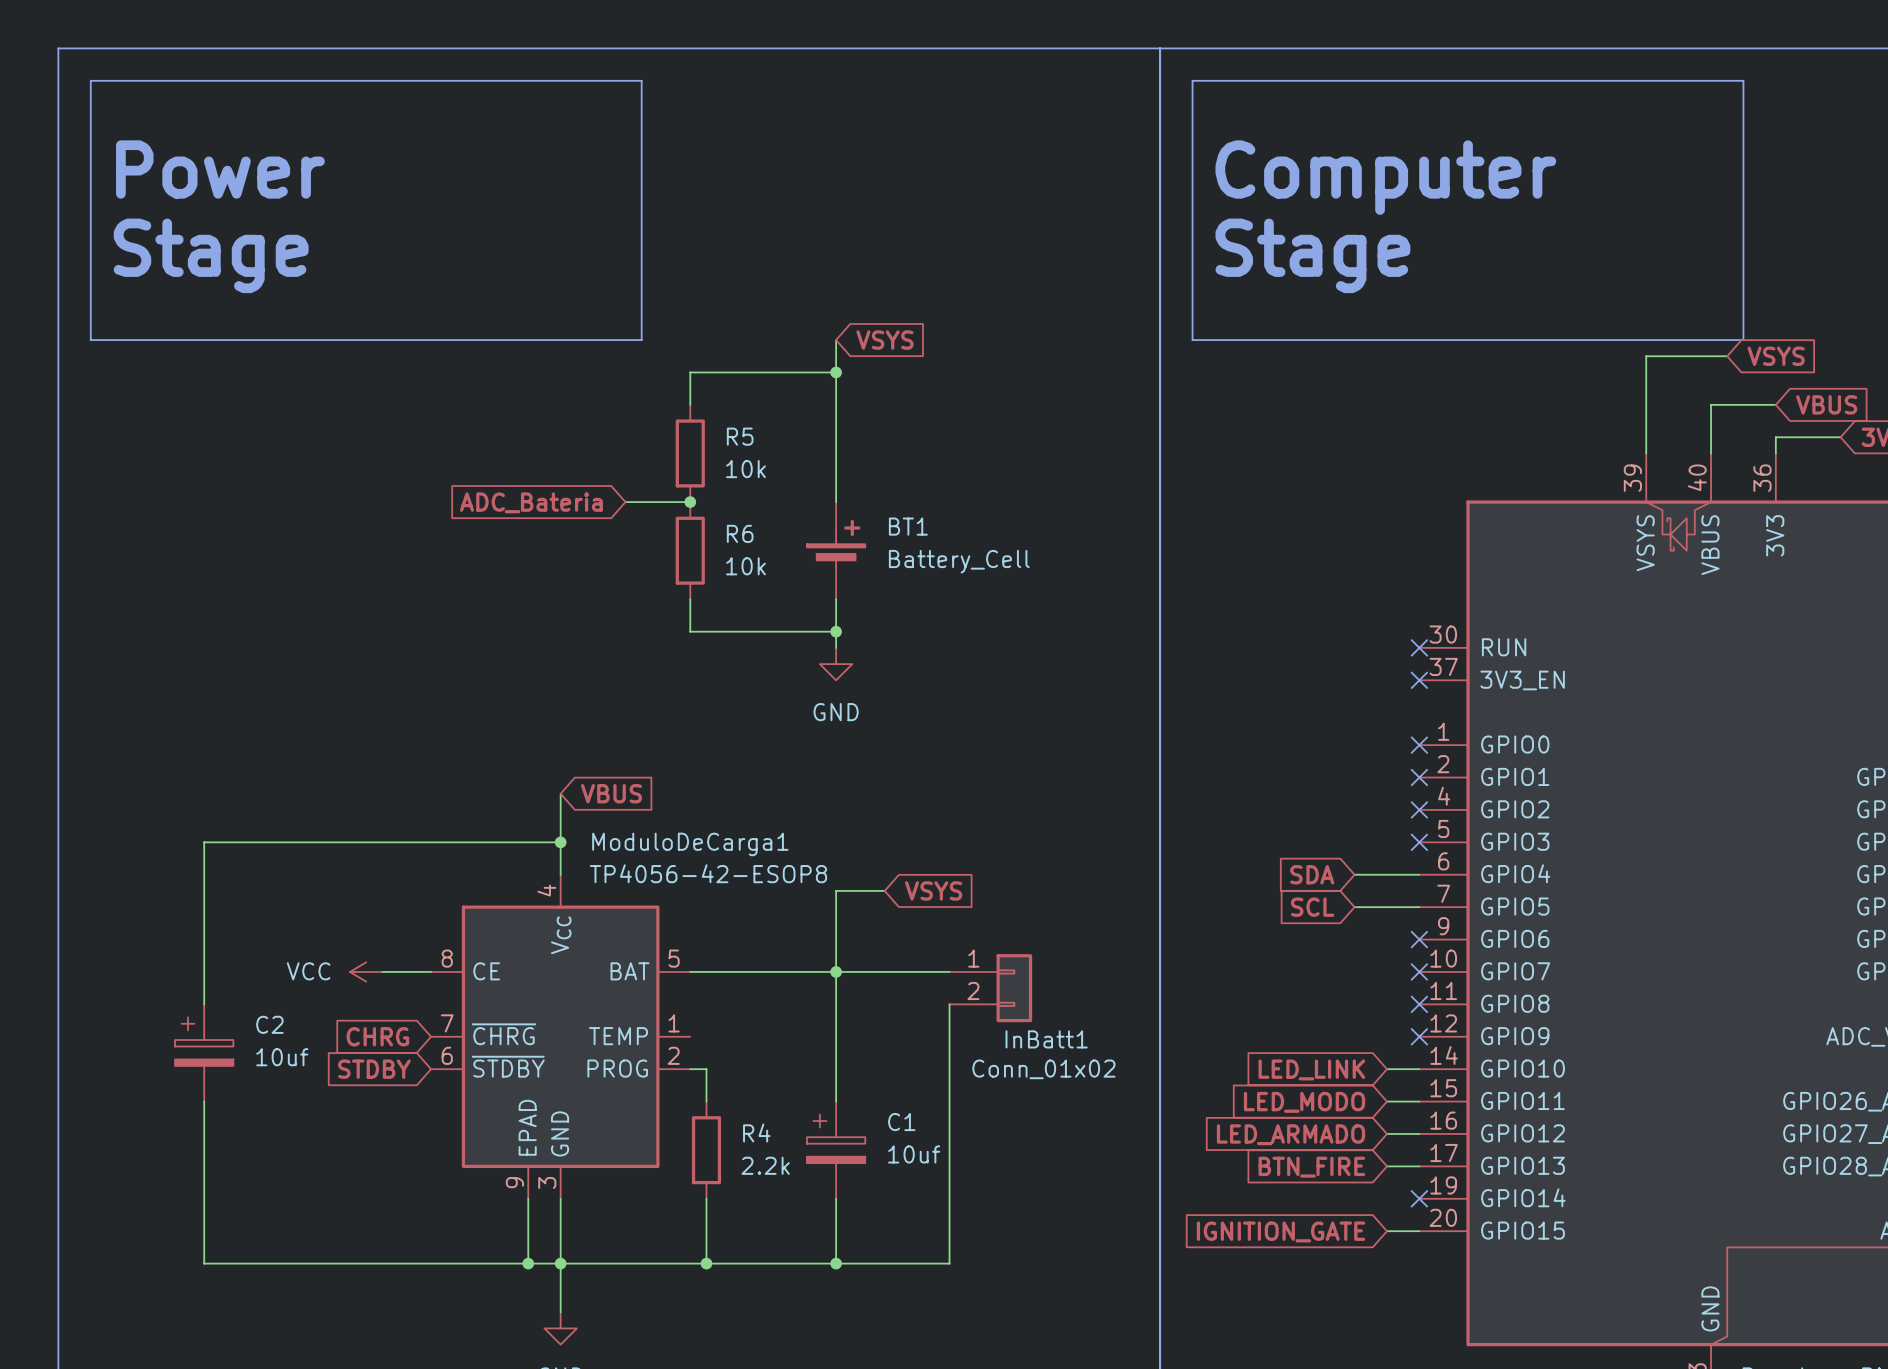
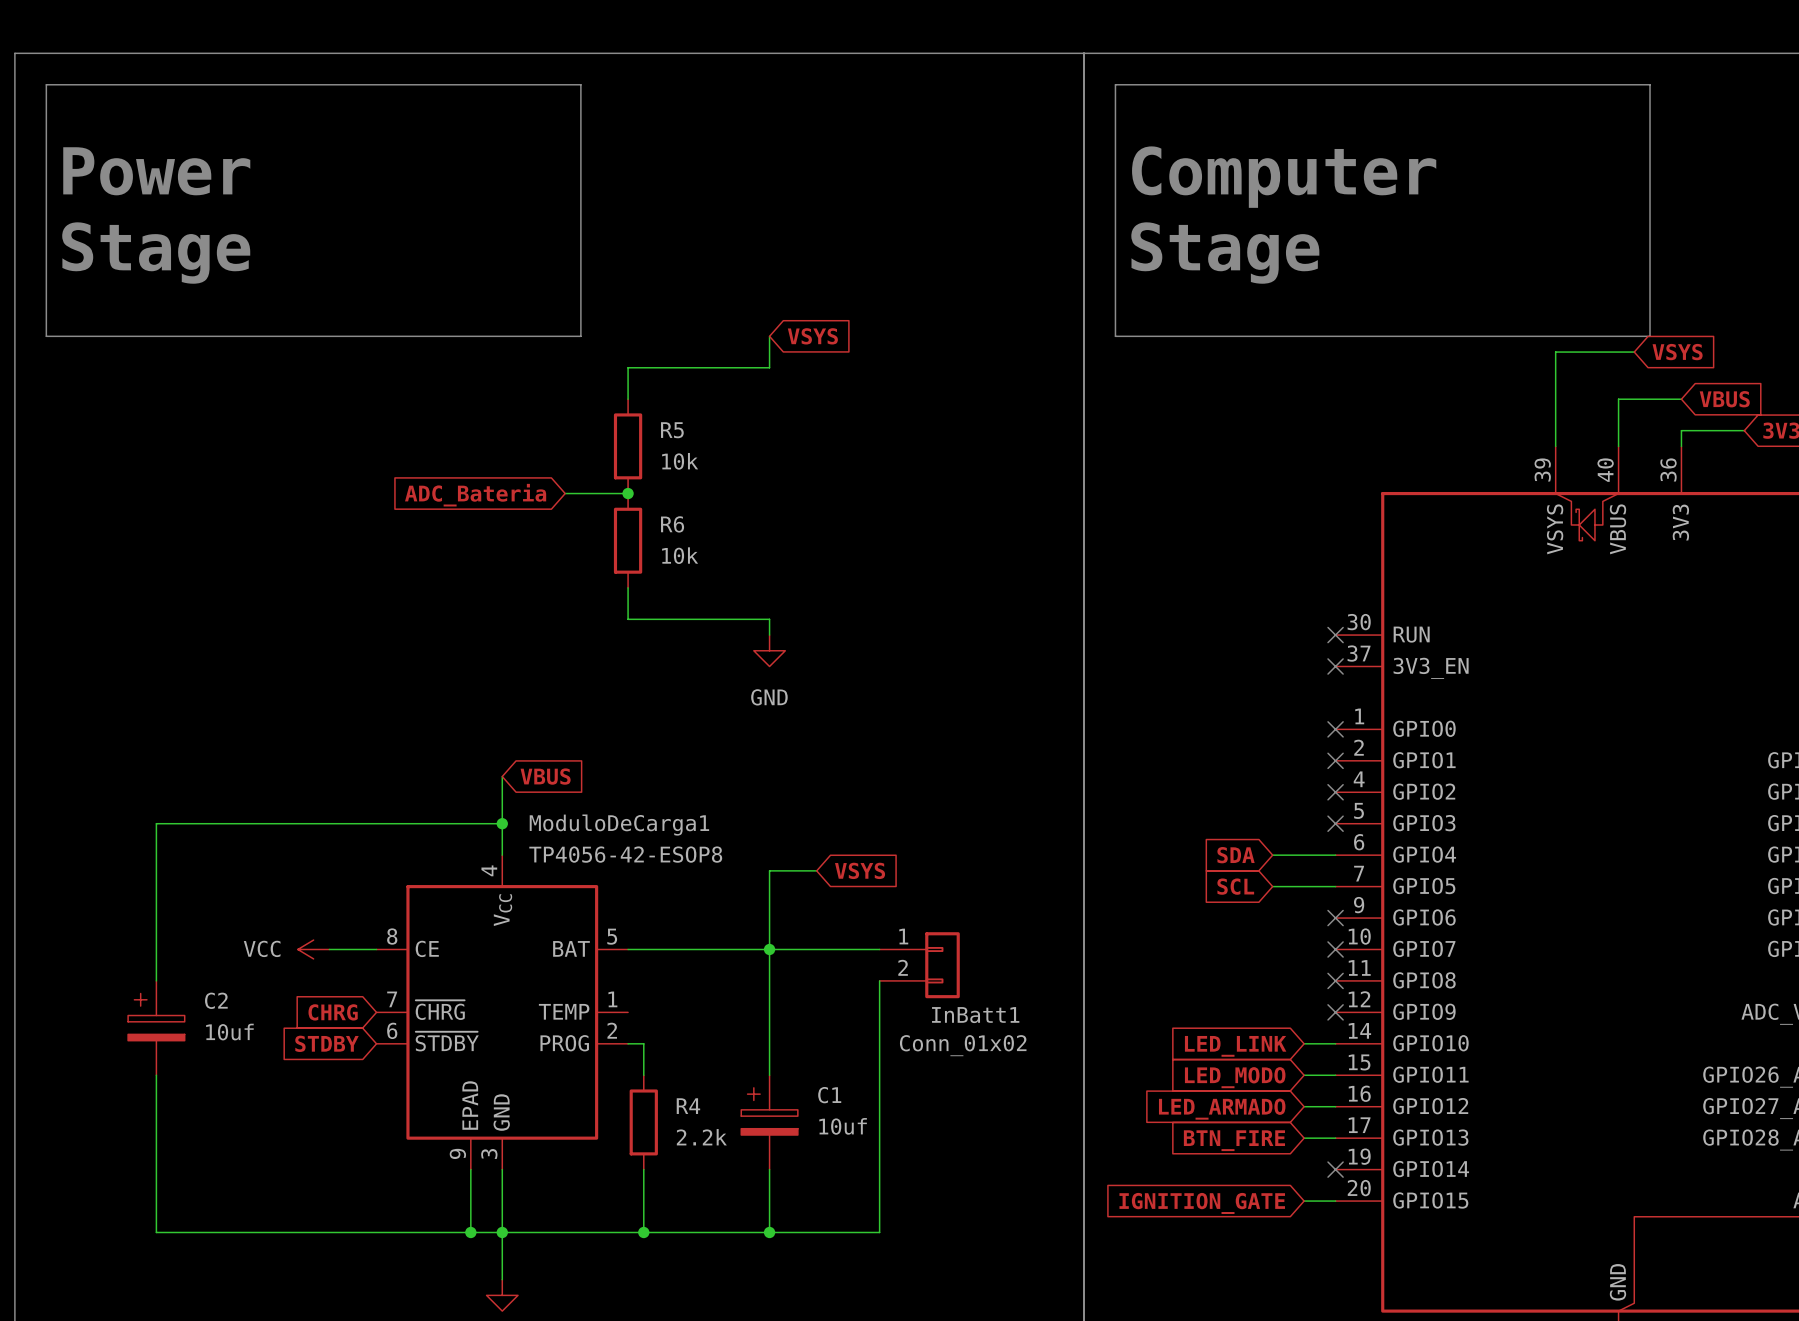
wire: (836, 372) (836, 502) -> none
junction: (836, 372) -> none
BT1: Battery_Cell (836, 550) -> none
wire: (836, 599) (836, 631) -> none
junction: (836, 631) -> none

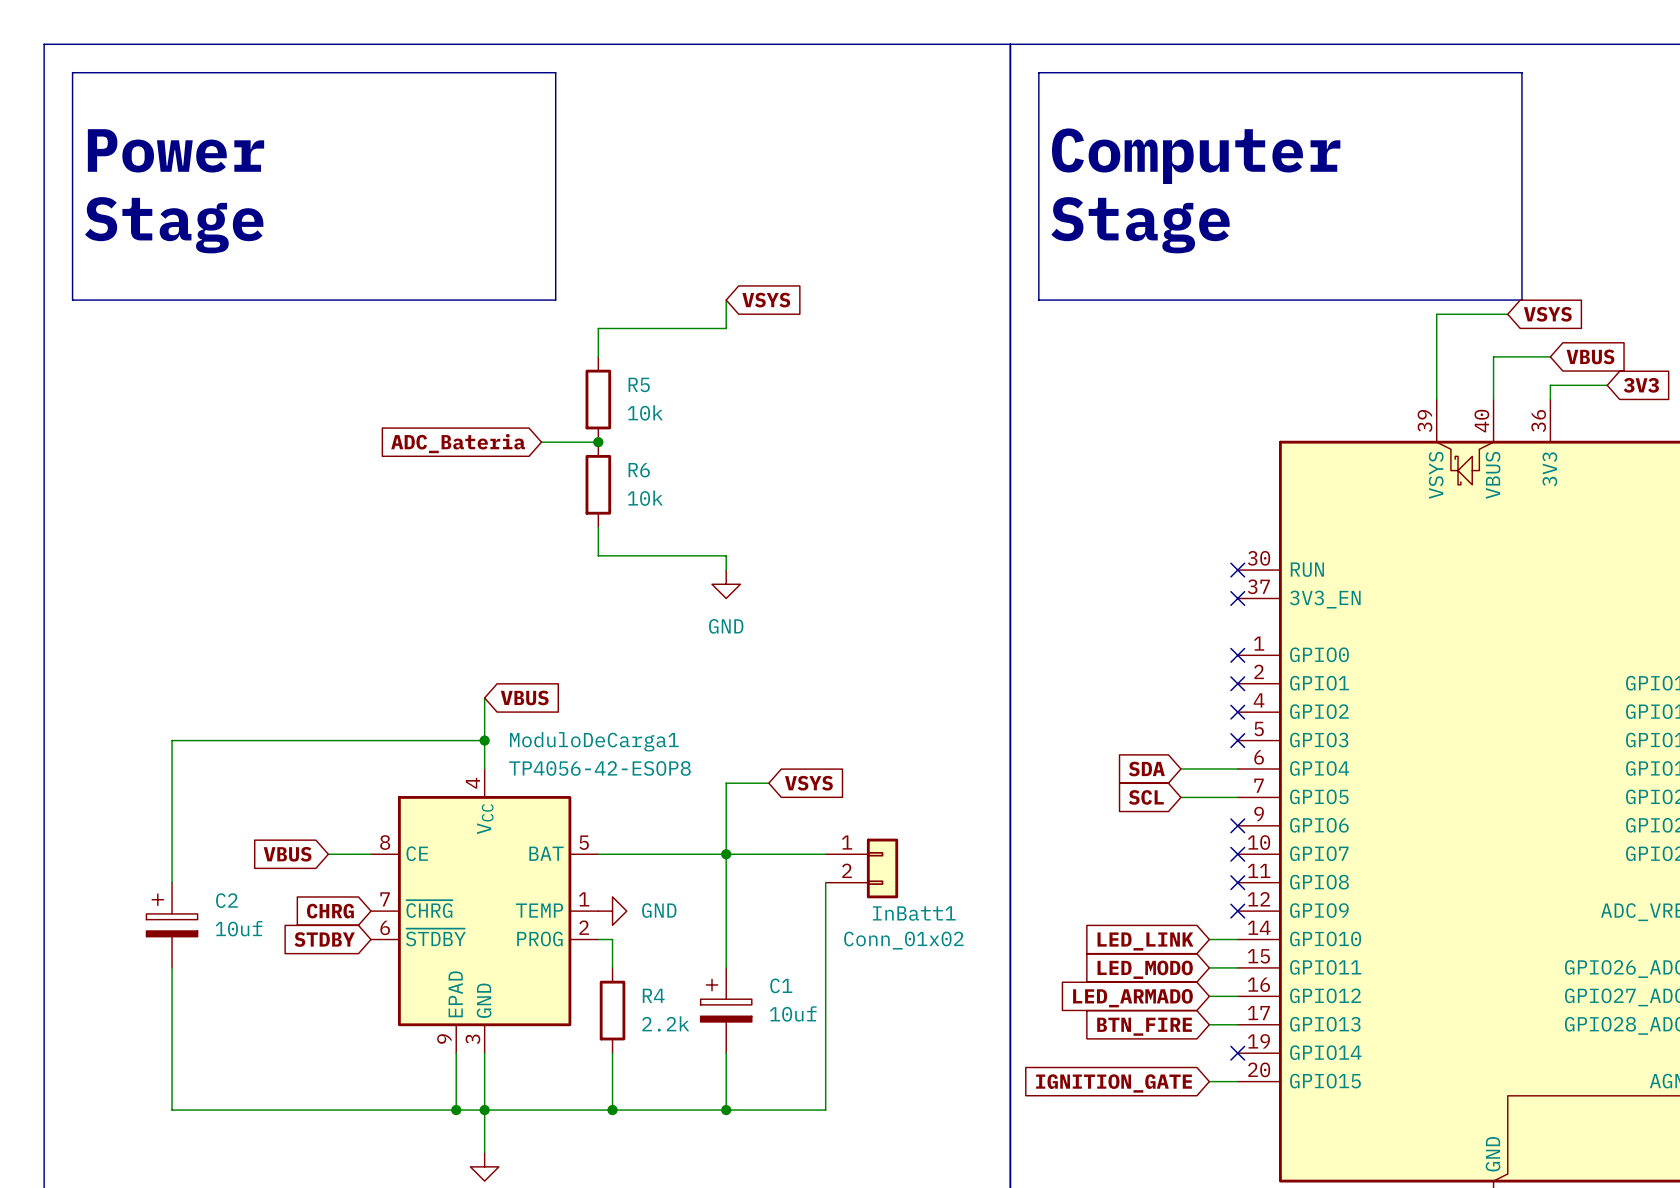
global label: none -> VBUS (287, 854)
power symbol: VCC (313, 949) -> none
power symbol: none -> GND (612, 911)

